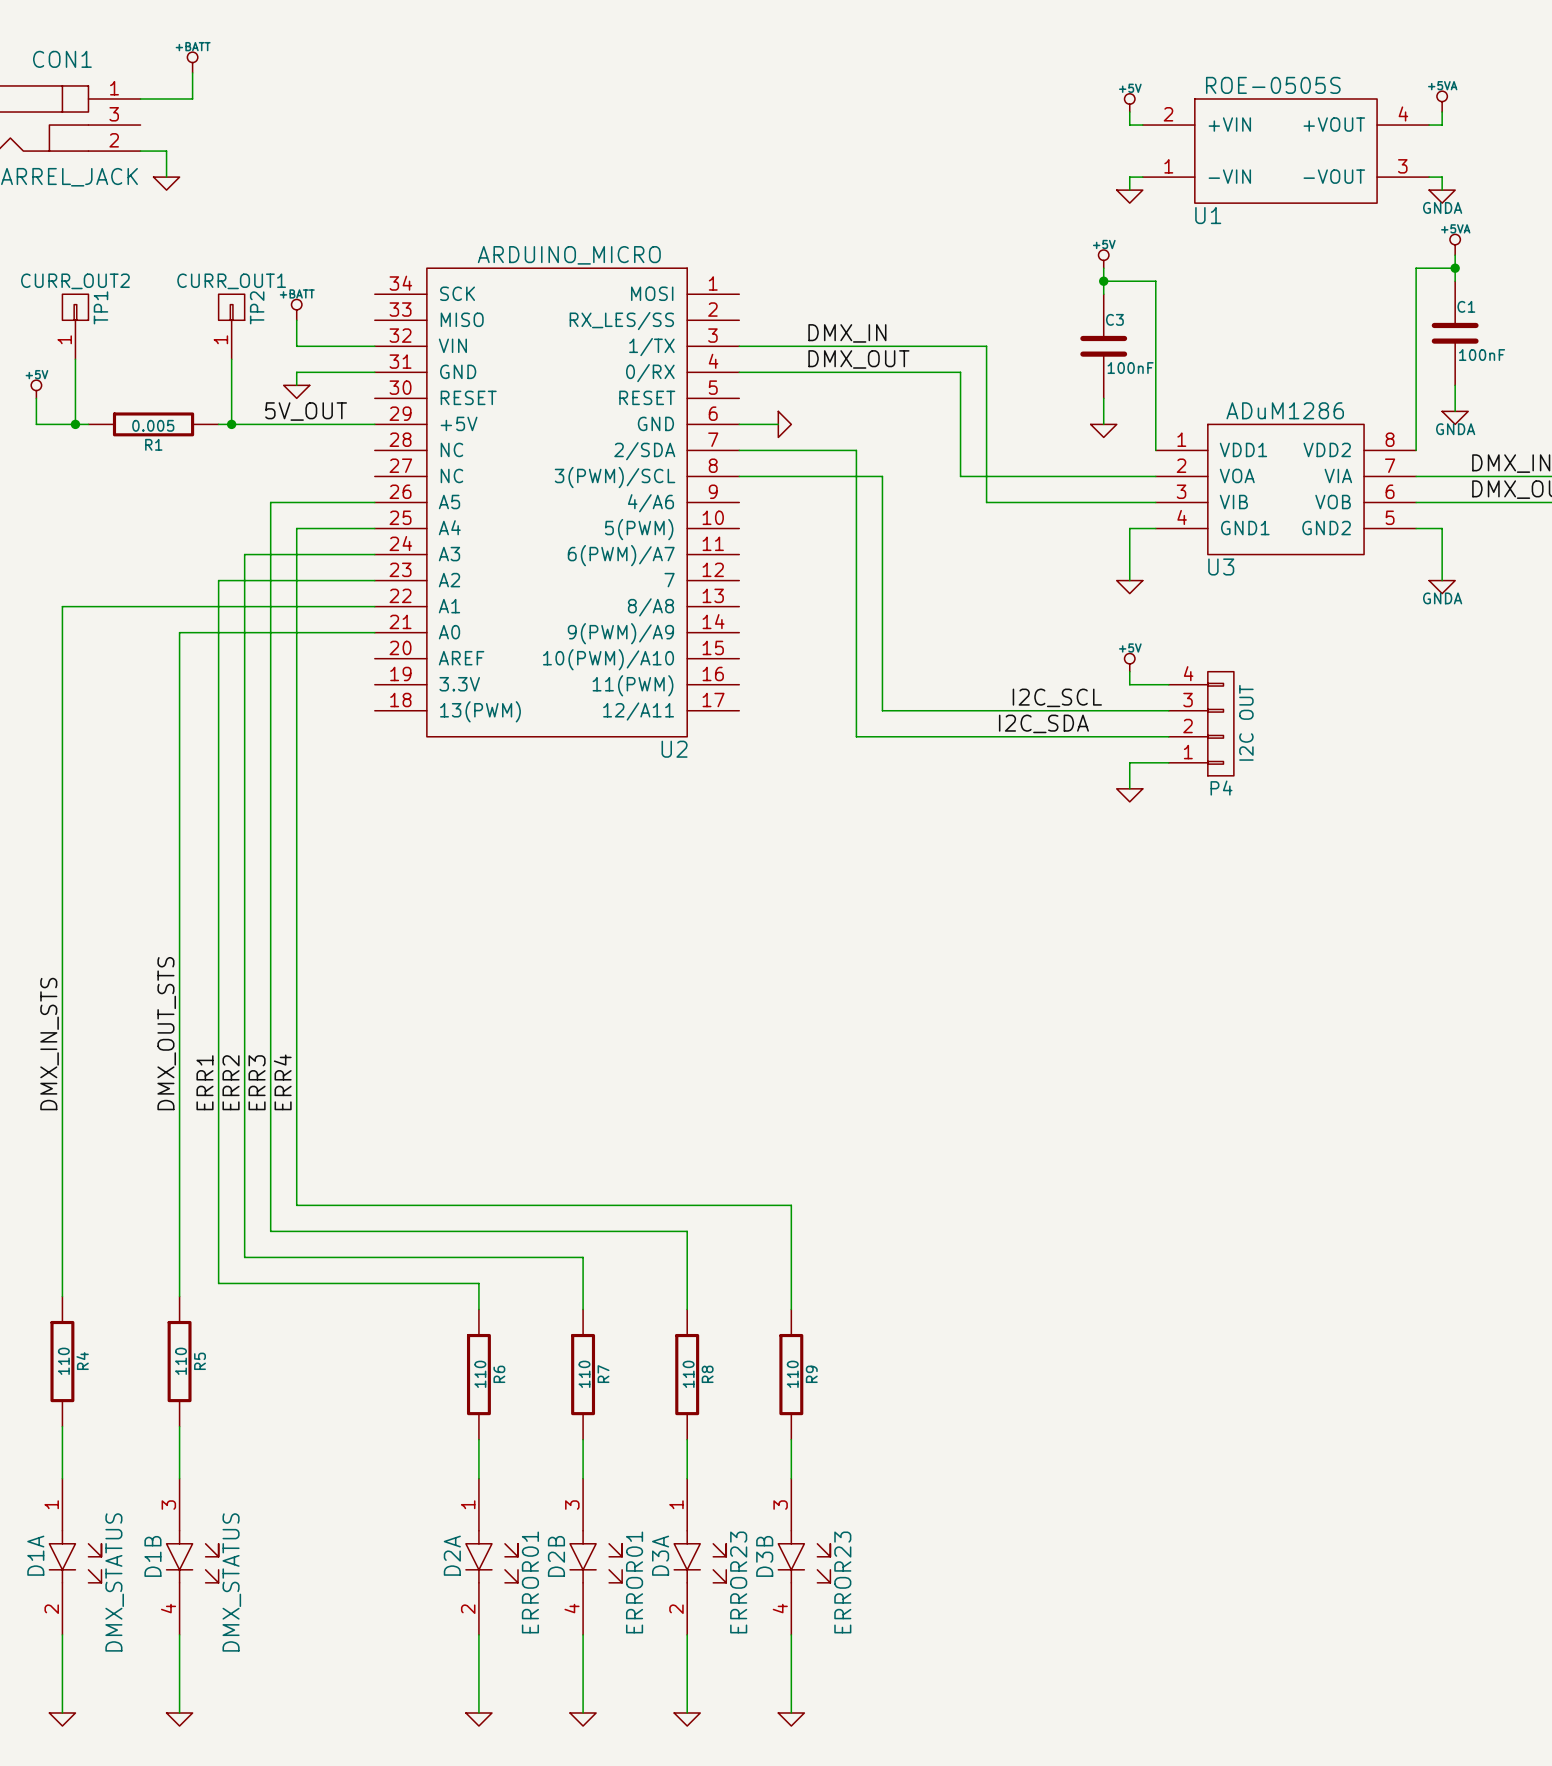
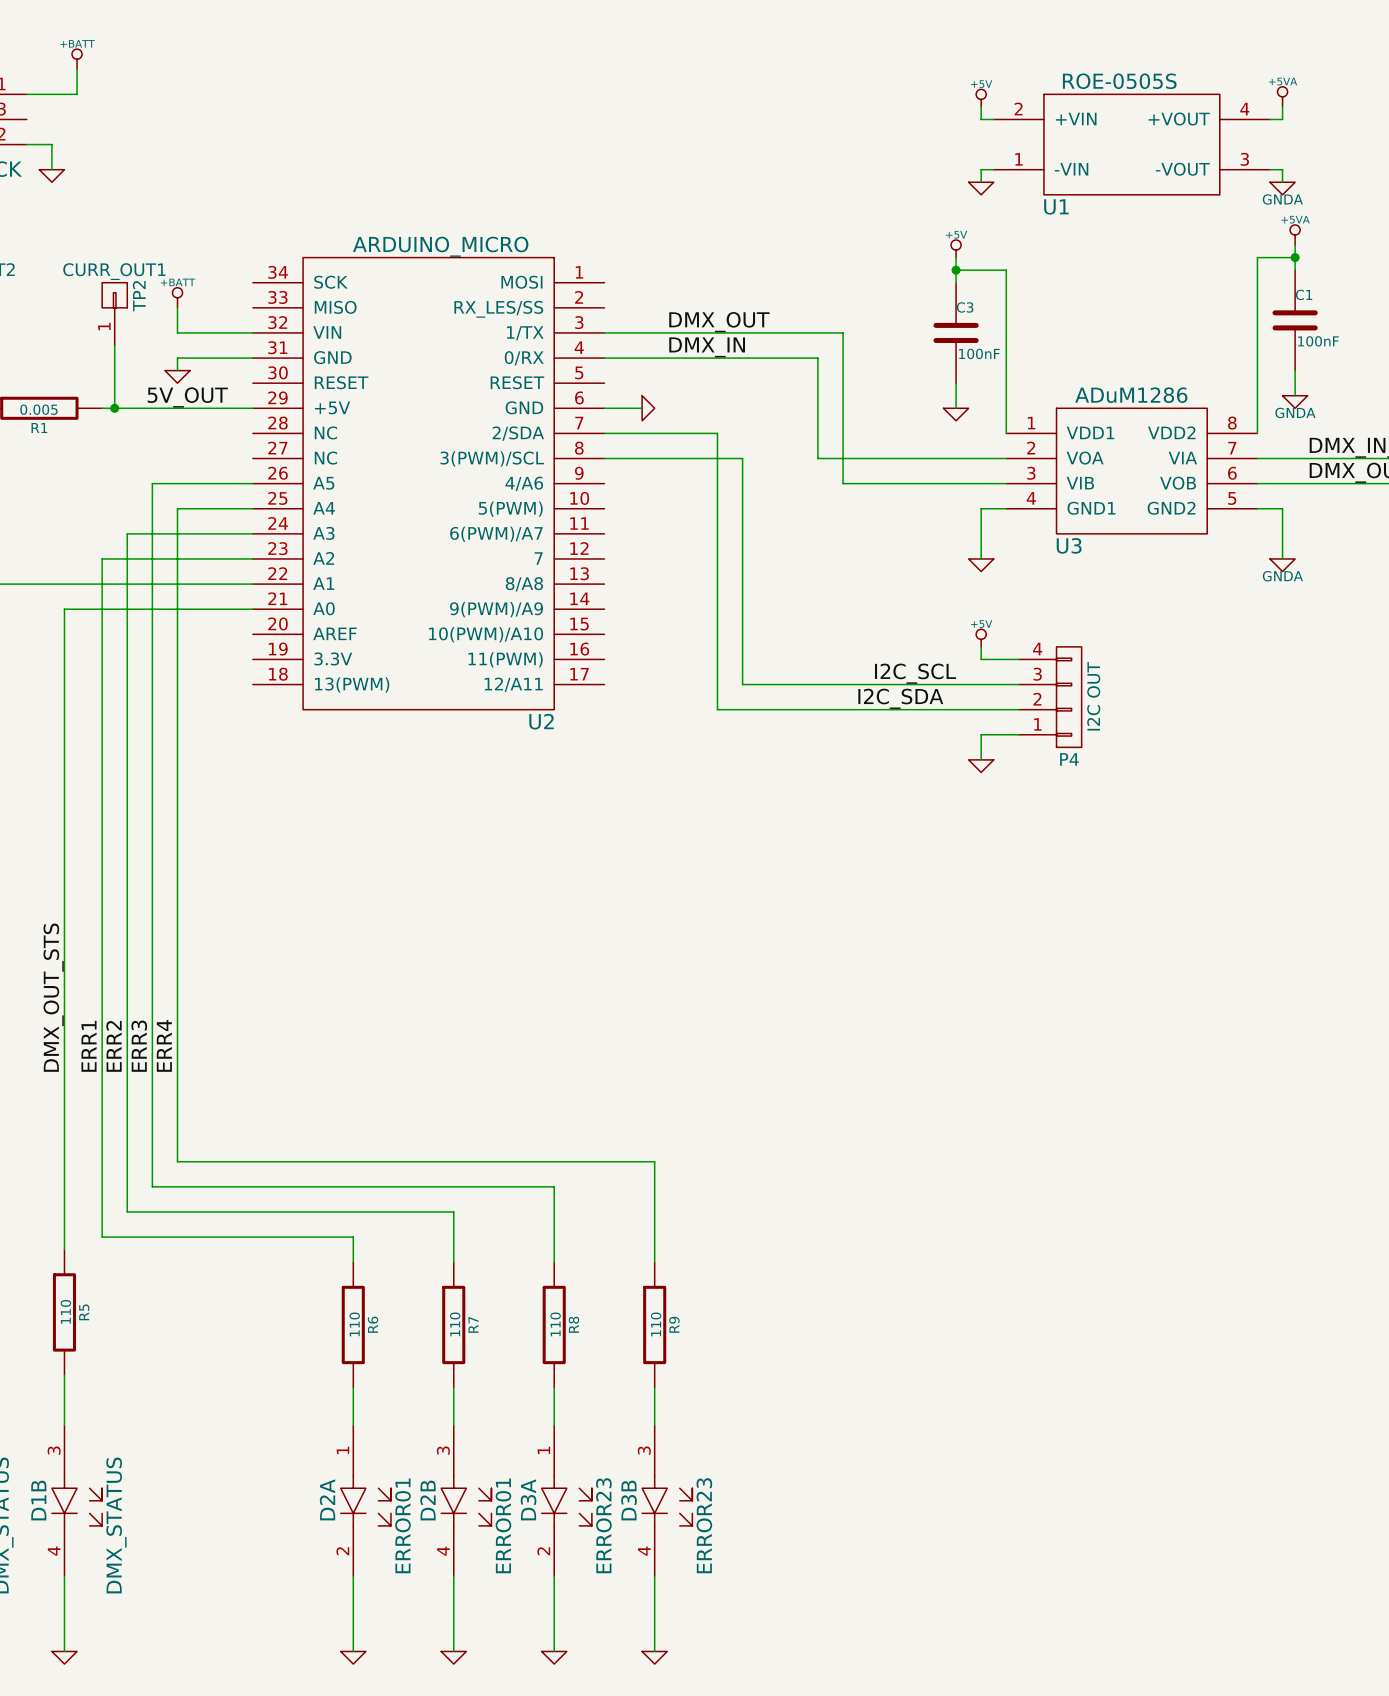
label: DMX_IN (847, 333) -> DMX_OUT (719, 322)
label: DMX_OUT (858, 359) -> DMX_IN (707, 347)

